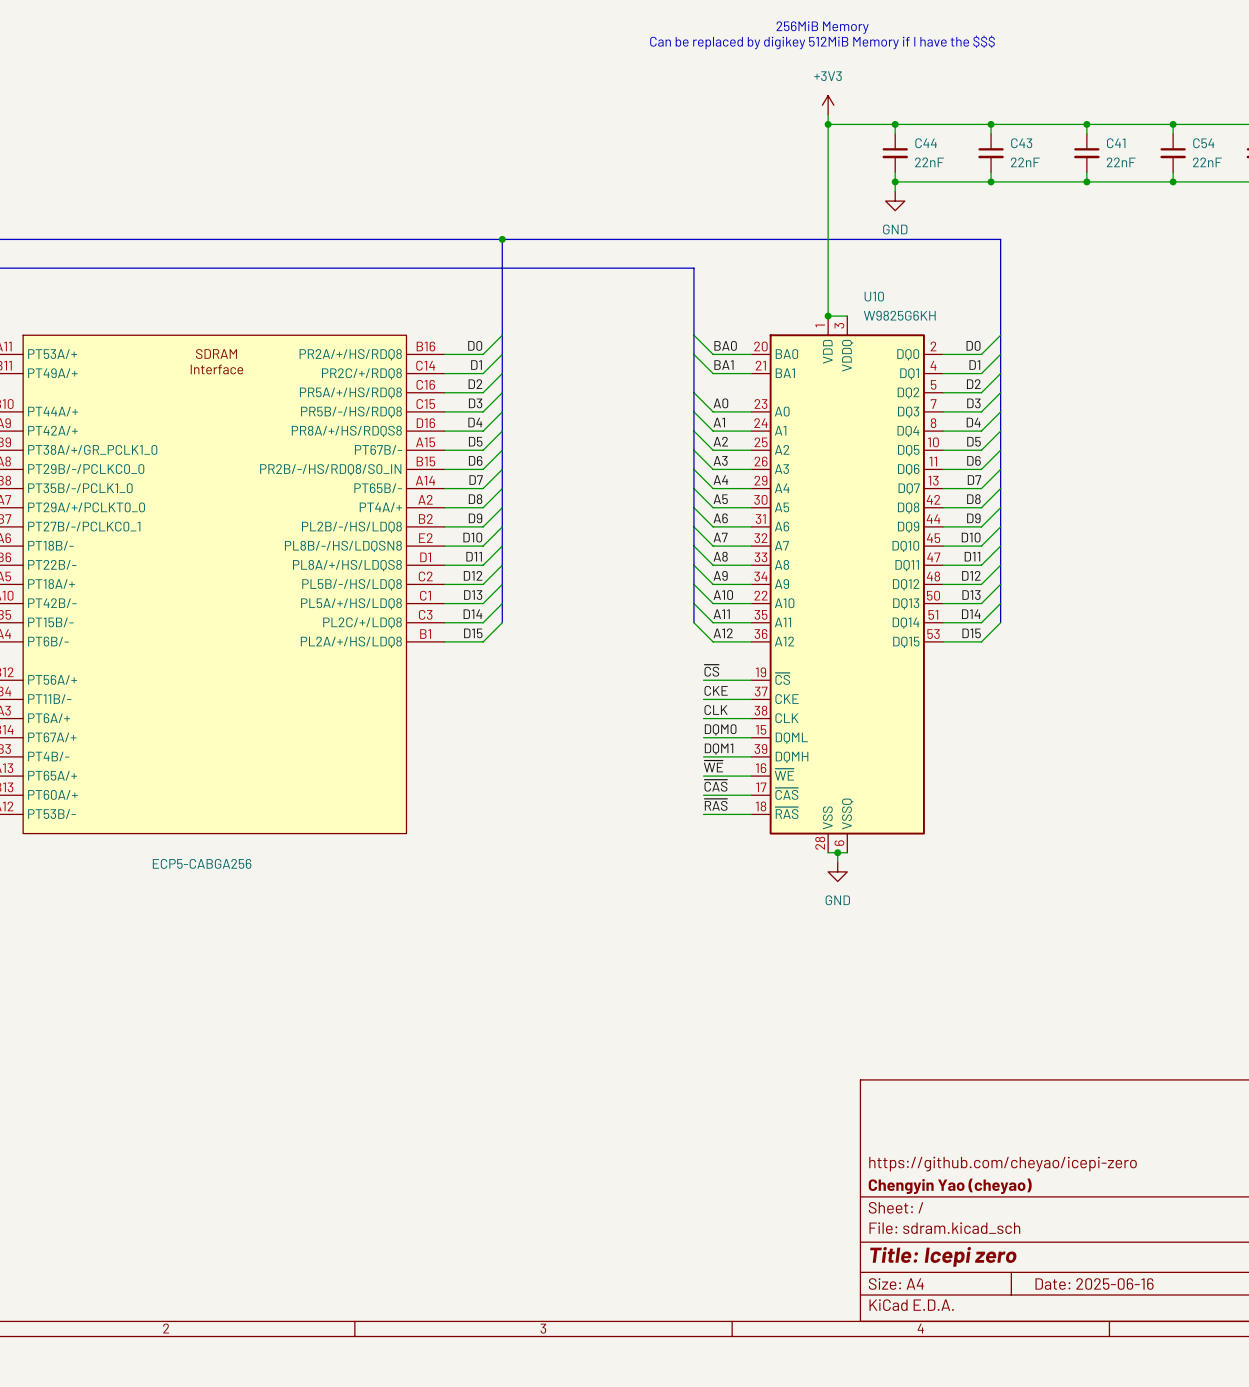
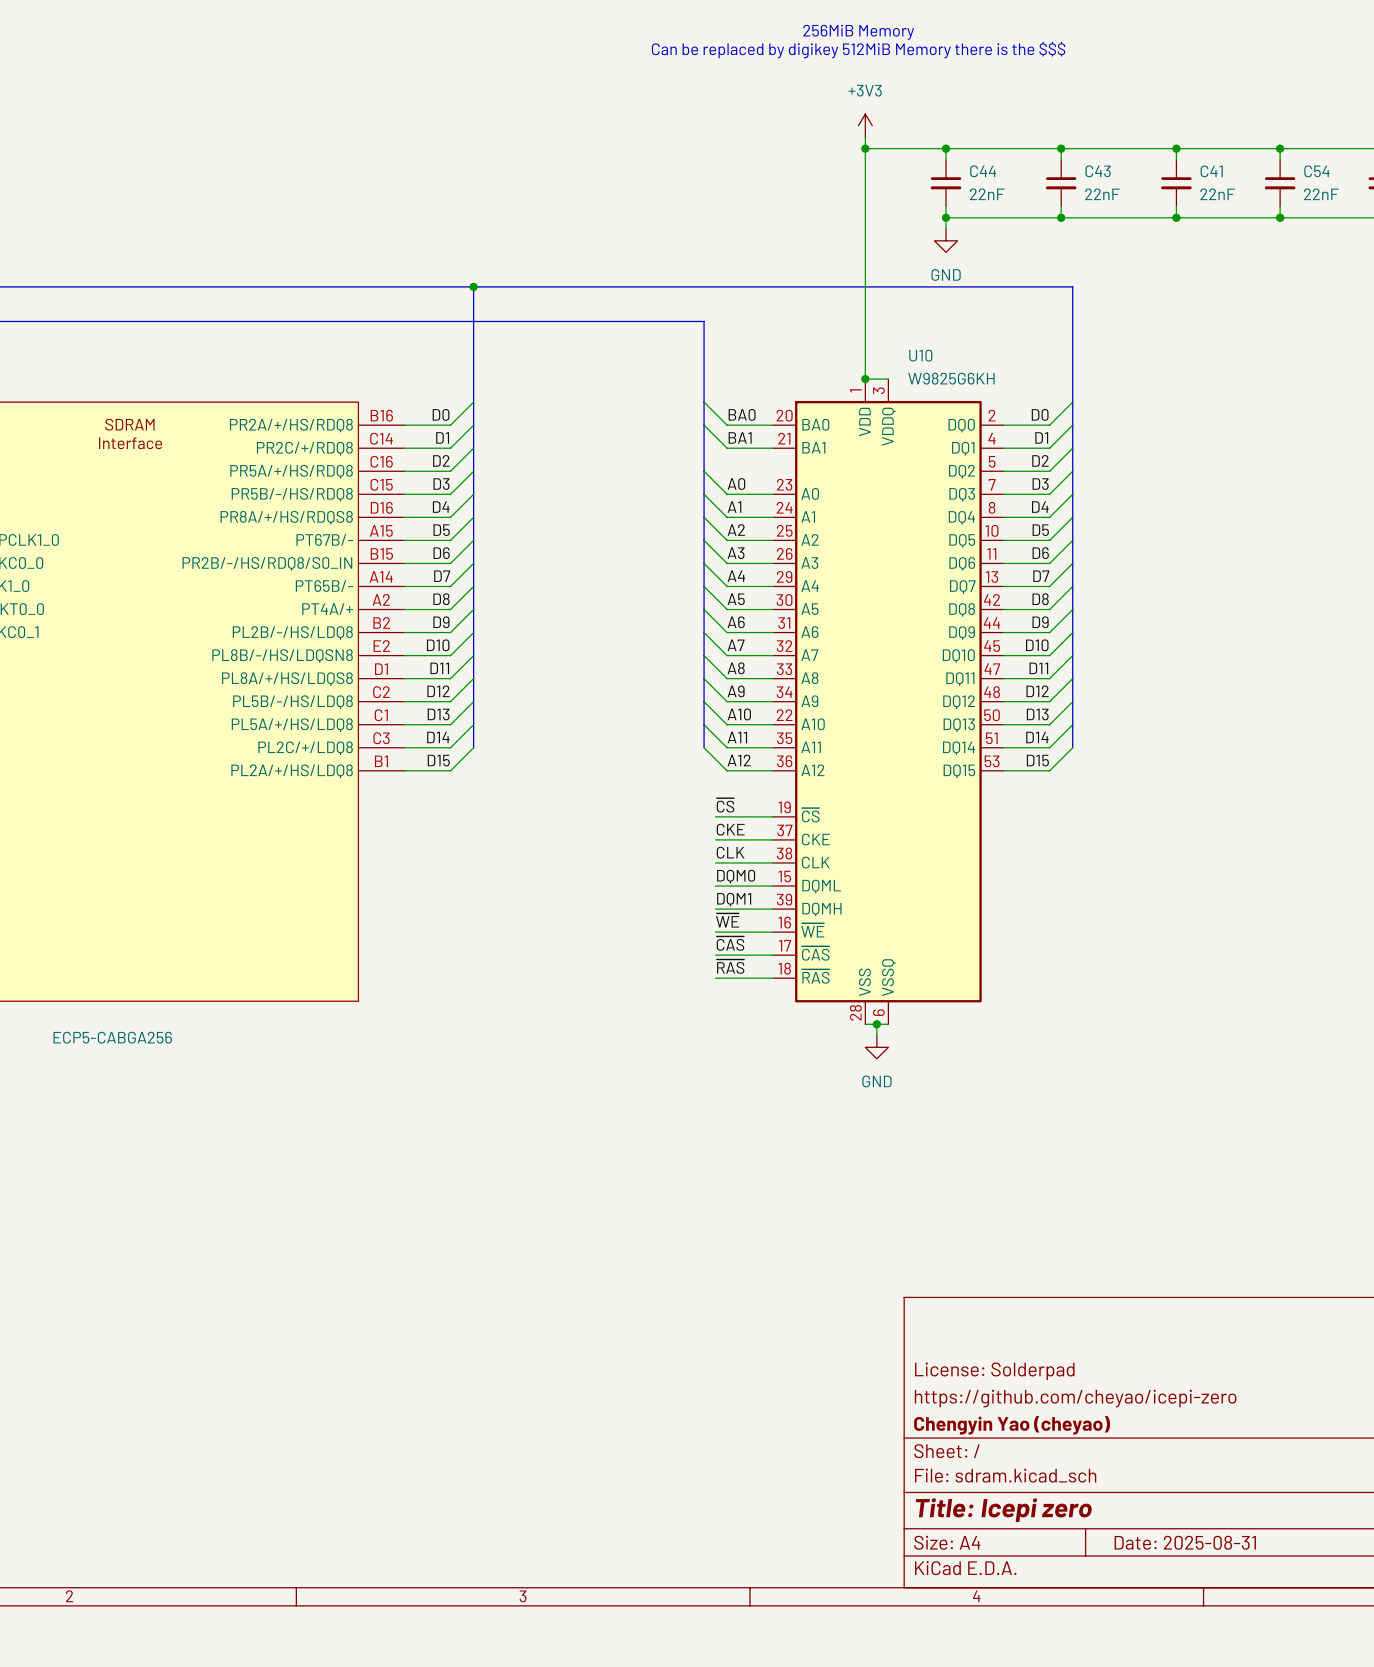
text: Can be replaced by digikey 512MiB Memory if I have the $$$ (822, 42) -> Can be replaced by digikey 512MiB Memory there is the $$$ (858, 50)
title block: none -> License: Solderpad (994, 1371)
title block: Date: 2025-06-16 (1094, 1284) -> Date: 2025-08-31 (1185, 1542)

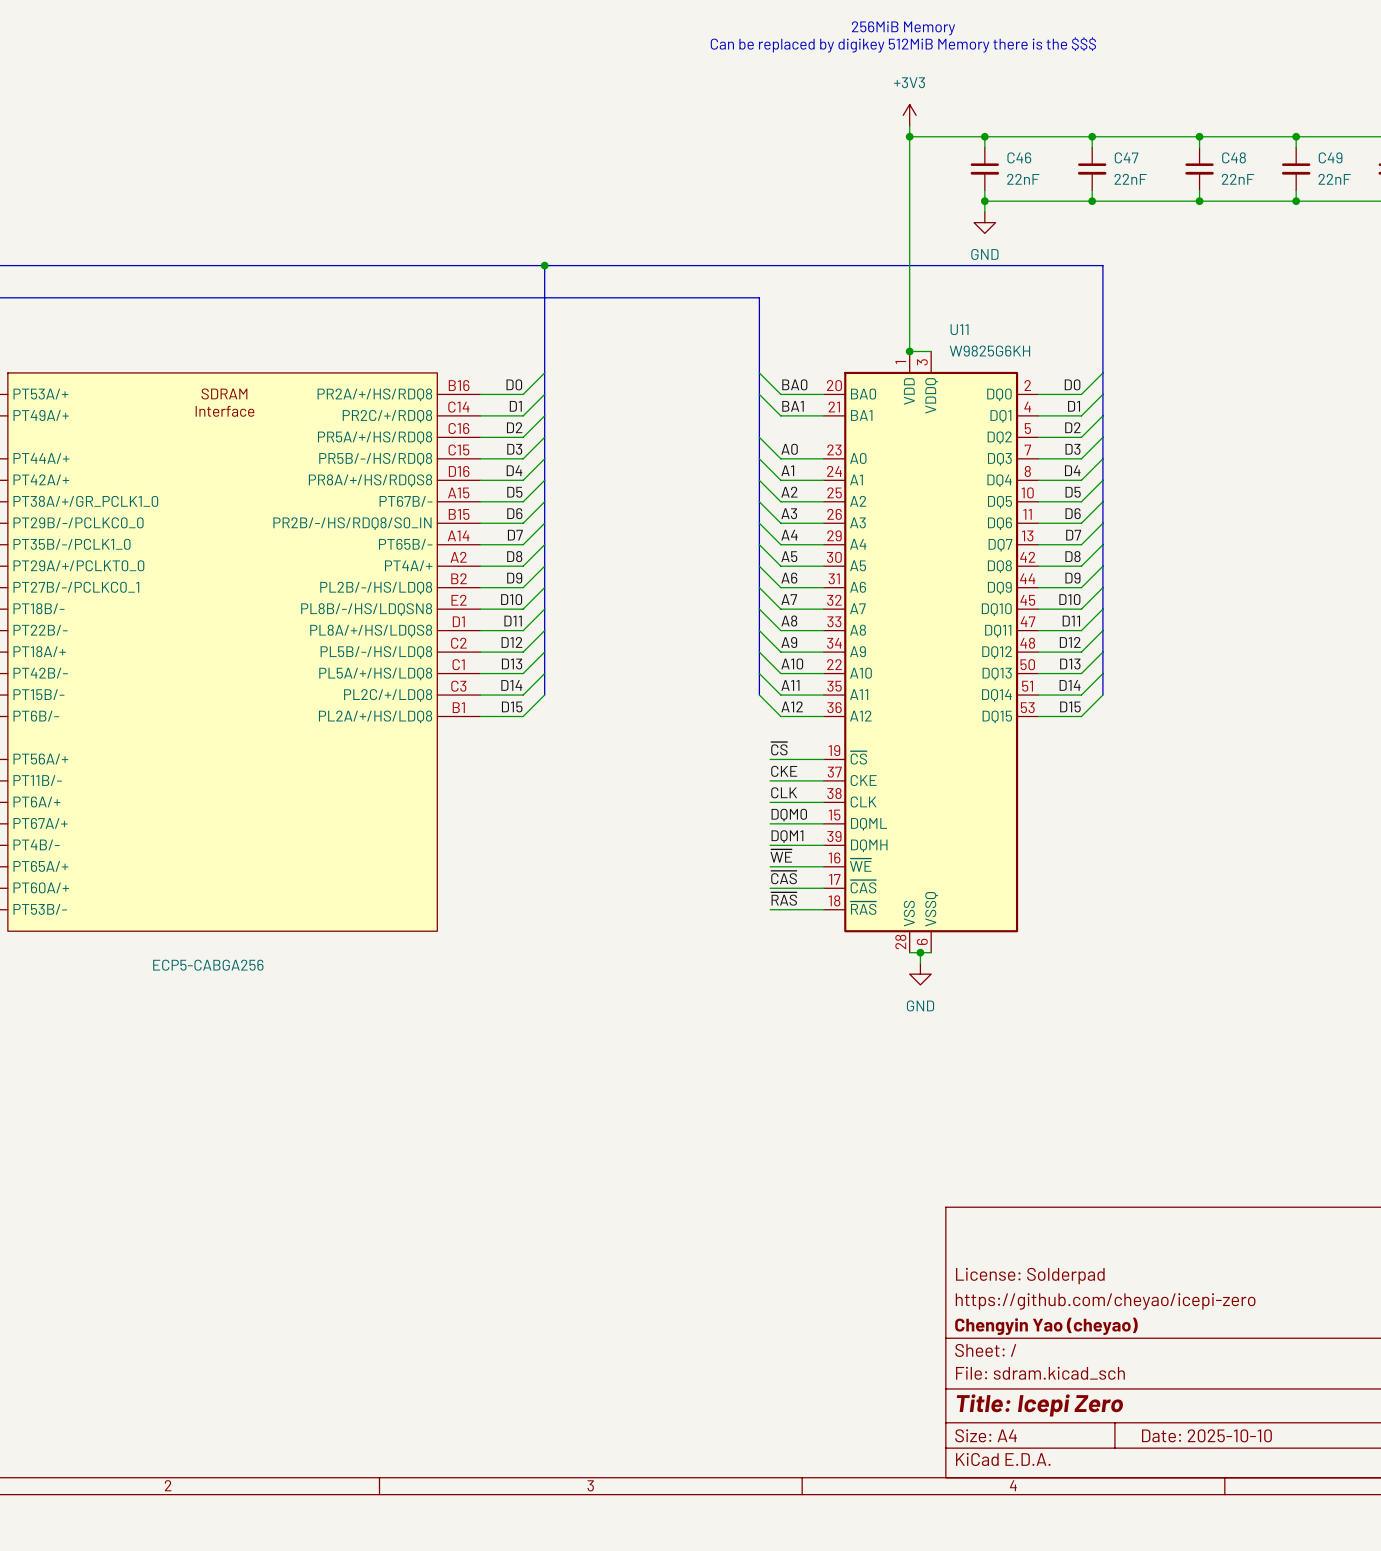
C44 name: C44 (983, 171) -> C46 (1019, 157)
C43 name: C43 (1098, 171) -> C47 (1126, 157)
C41 name: C41 (1211, 171) -> C48 (1233, 157)
C54 name: C54 (1317, 171) -> C49 (1330, 157)
U10 name: U10 (920, 355) -> U11 (959, 329)
title block: Title: Icepi zero (1003, 1510) -> Title: Icepi Zero (1039, 1405)
title block: Date: 2025-08-31 (1185, 1542) -> Date: 2025-10-10 (1206, 1435)

